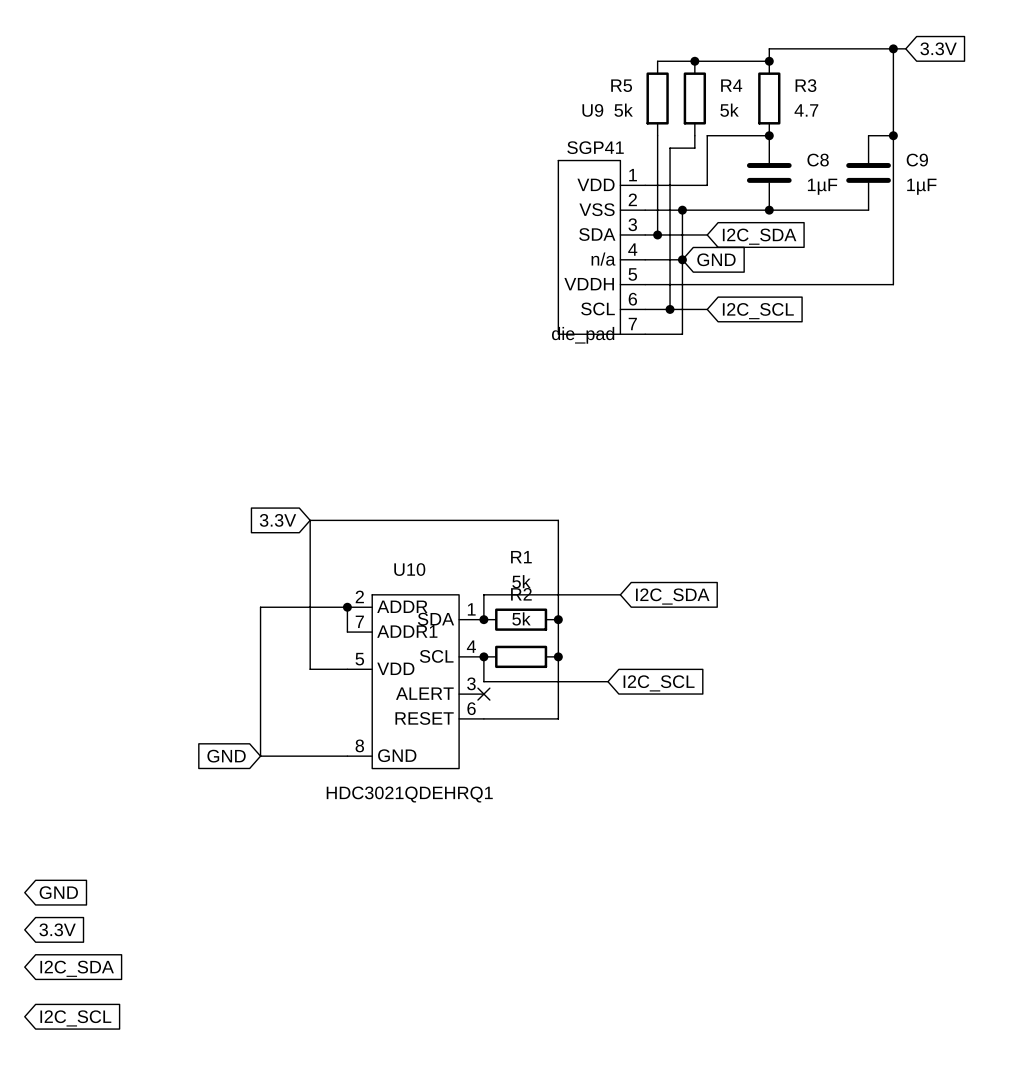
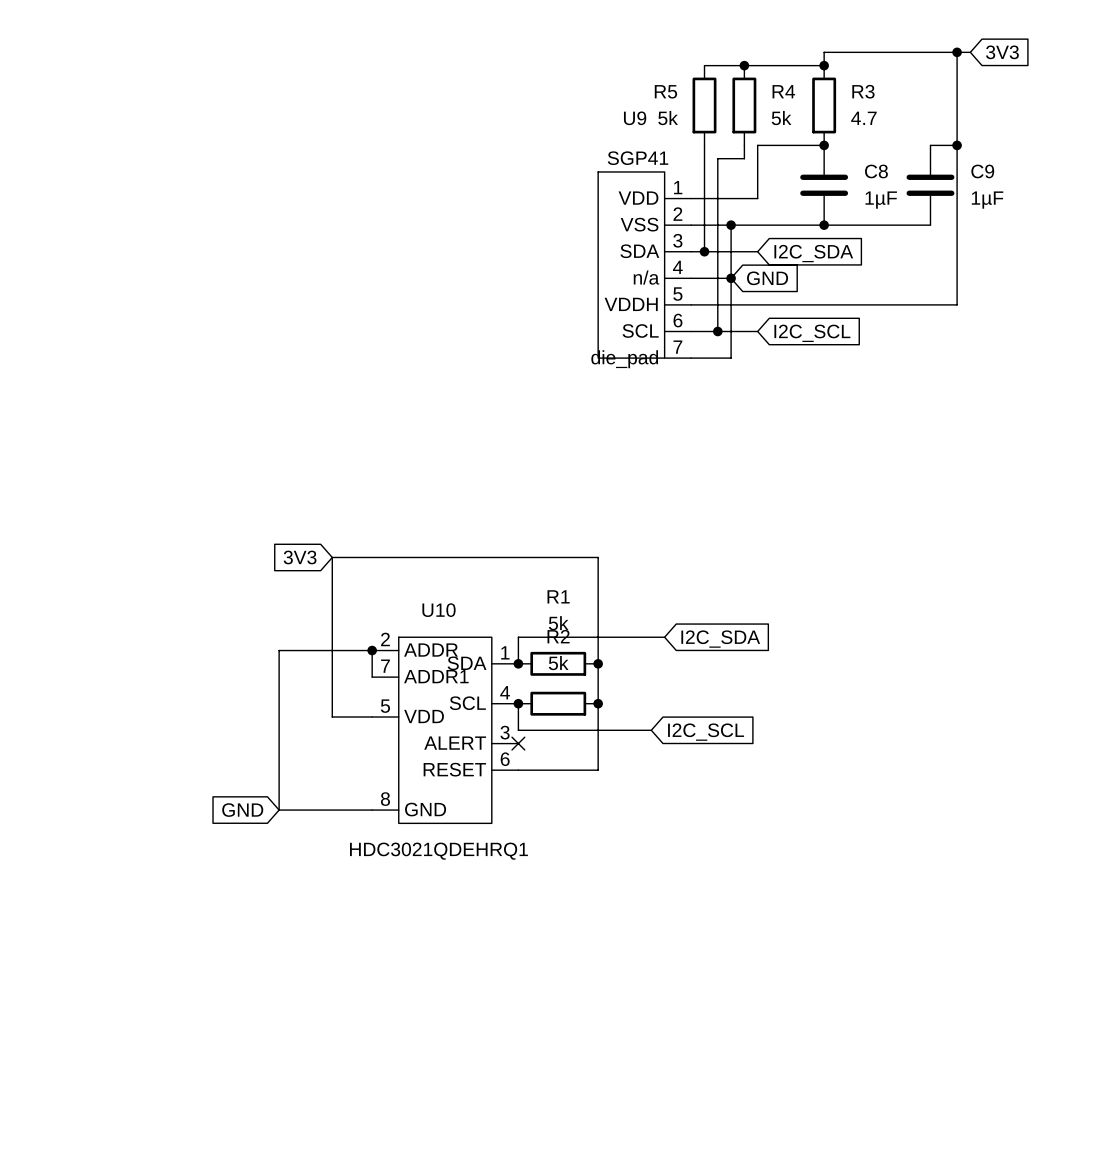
global label: 3.3V (938, 48) -> 3V3 (1002, 52)
global label: 3.3V (277, 520) -> 3V3 (300, 557)
global label: GND (58, 892) -> none
global label: 3.3V (57, 929) -> none
global label: I2C_SDA (77, 968) -> none
global label: I2C_SCL (75, 1018) -> none

